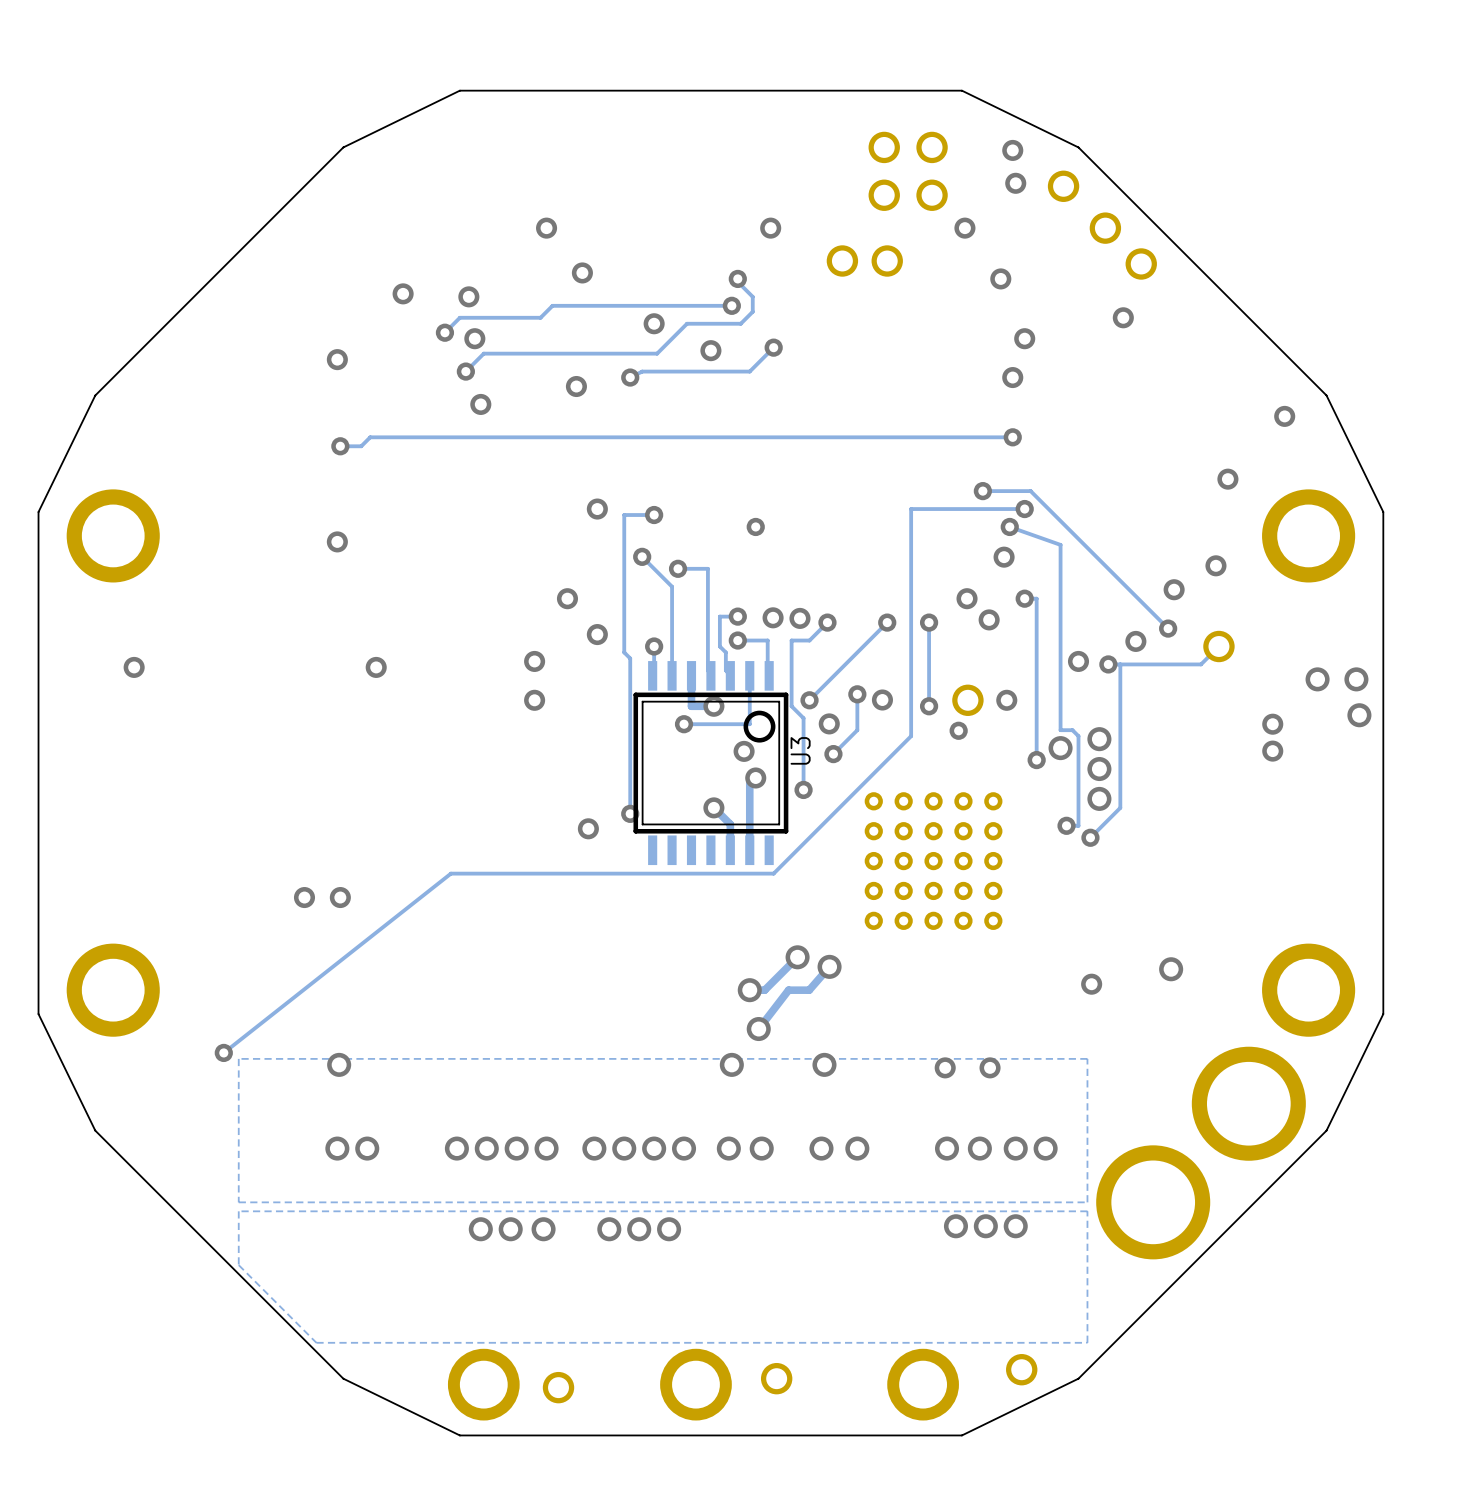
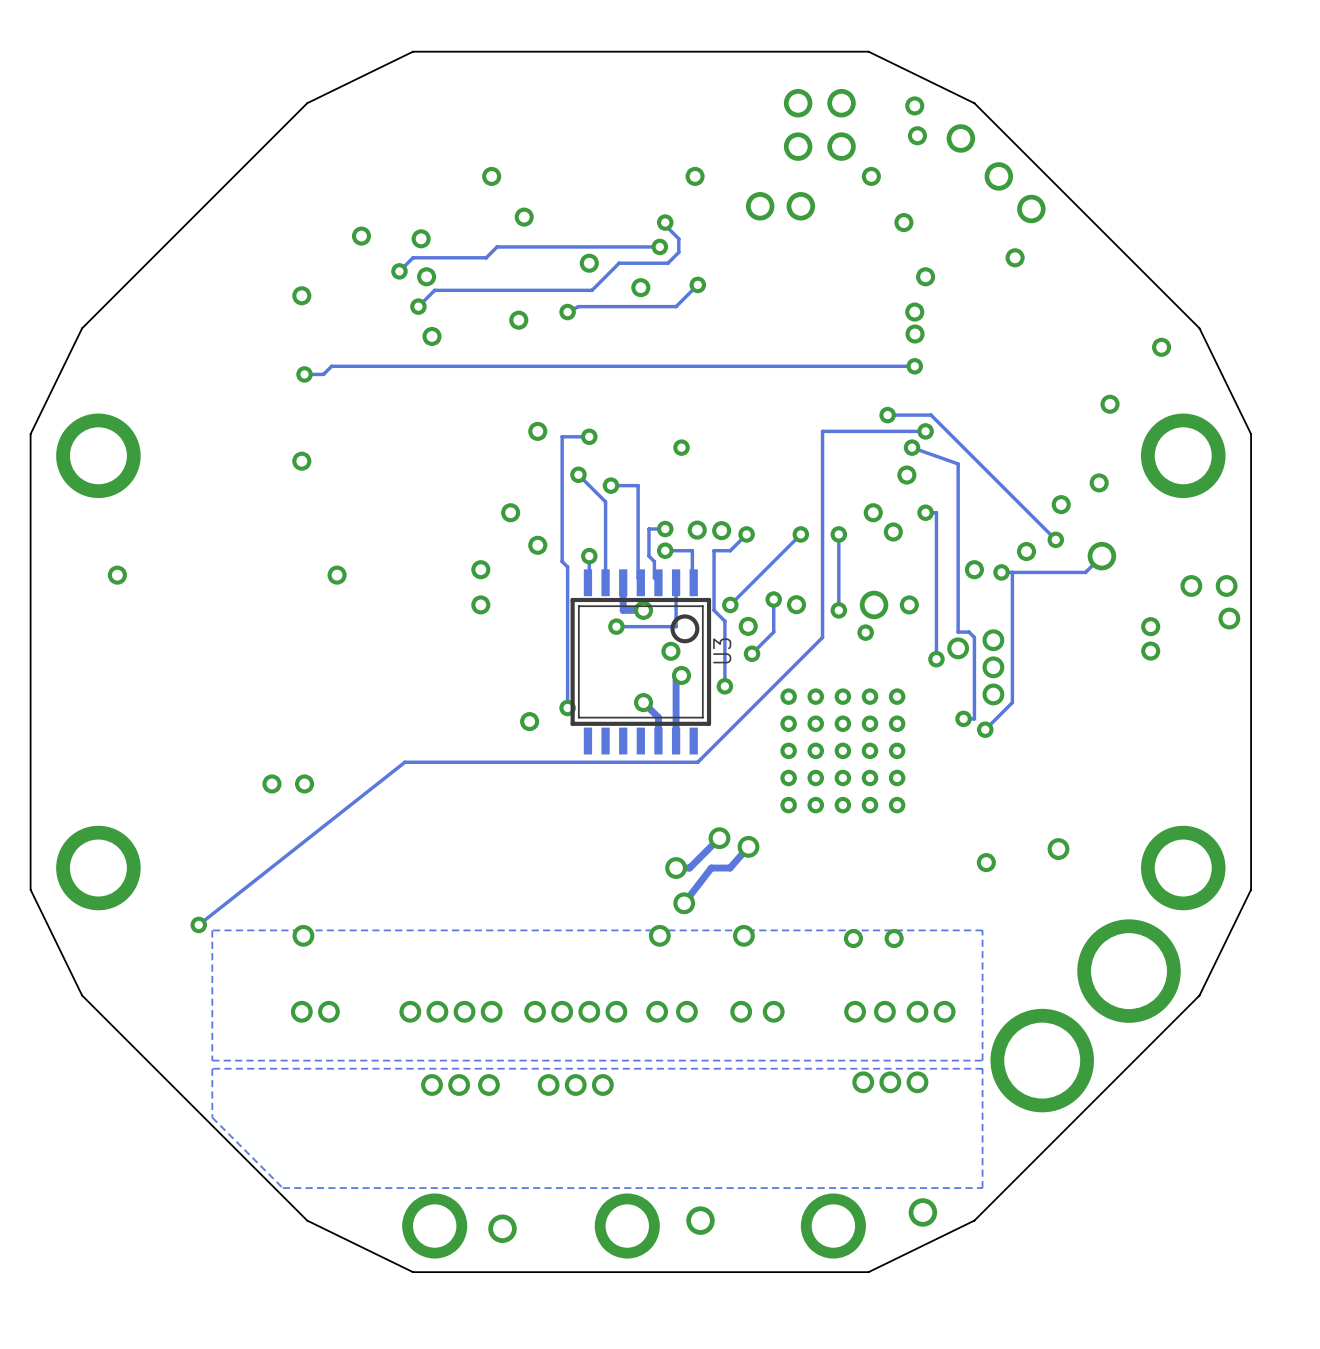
via: none -> (915, 334)

